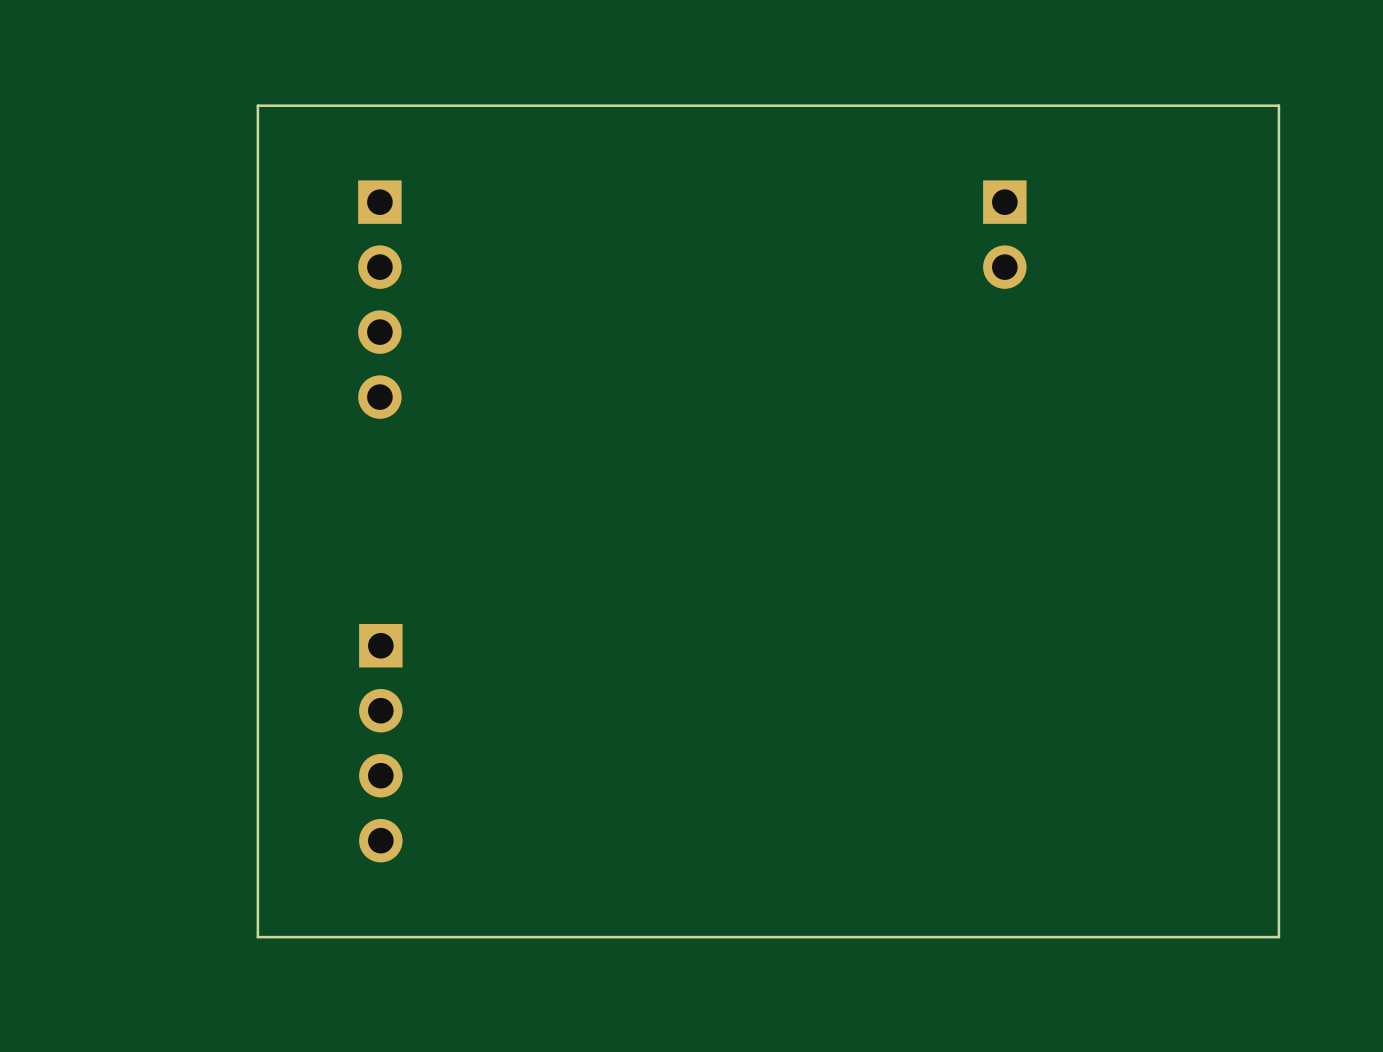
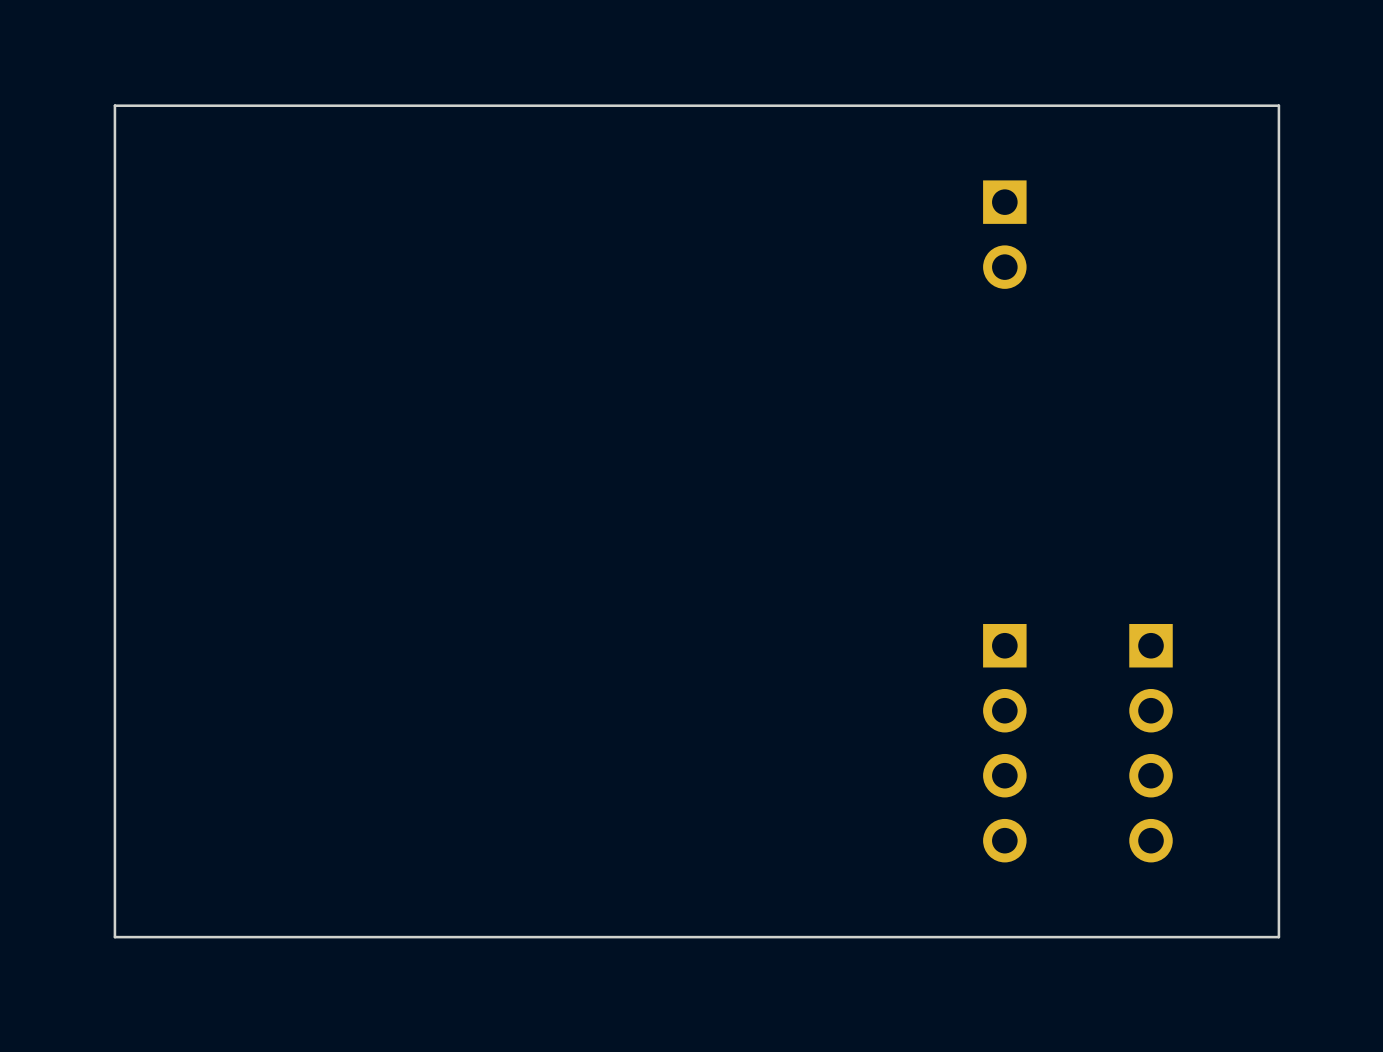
board edge: (257, 105) (257, 937) -> (257, 105) (114, 105) (114, 937) (257, 937)
part: (379, 299) -> none
part: (380, 743) -> none
part: none -> (1004, 743)
part: none -> (1151, 743)

